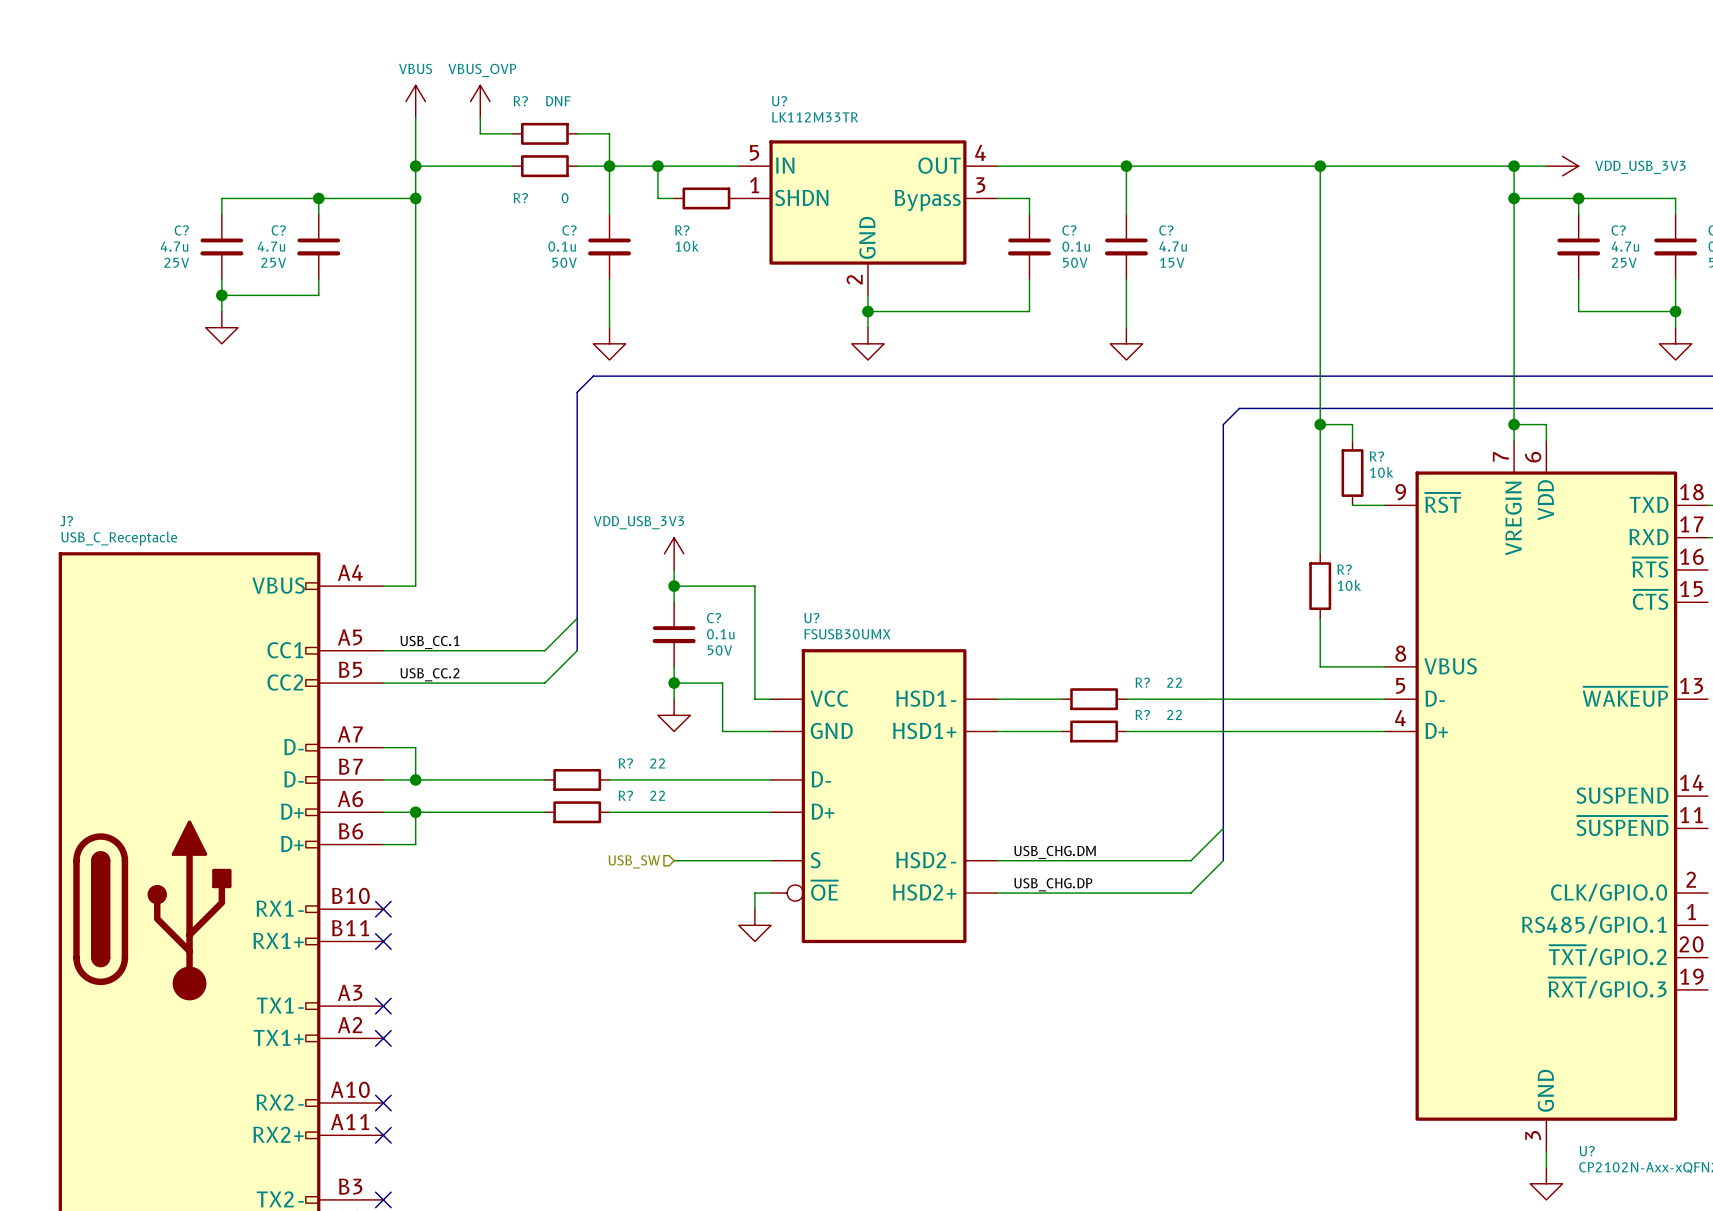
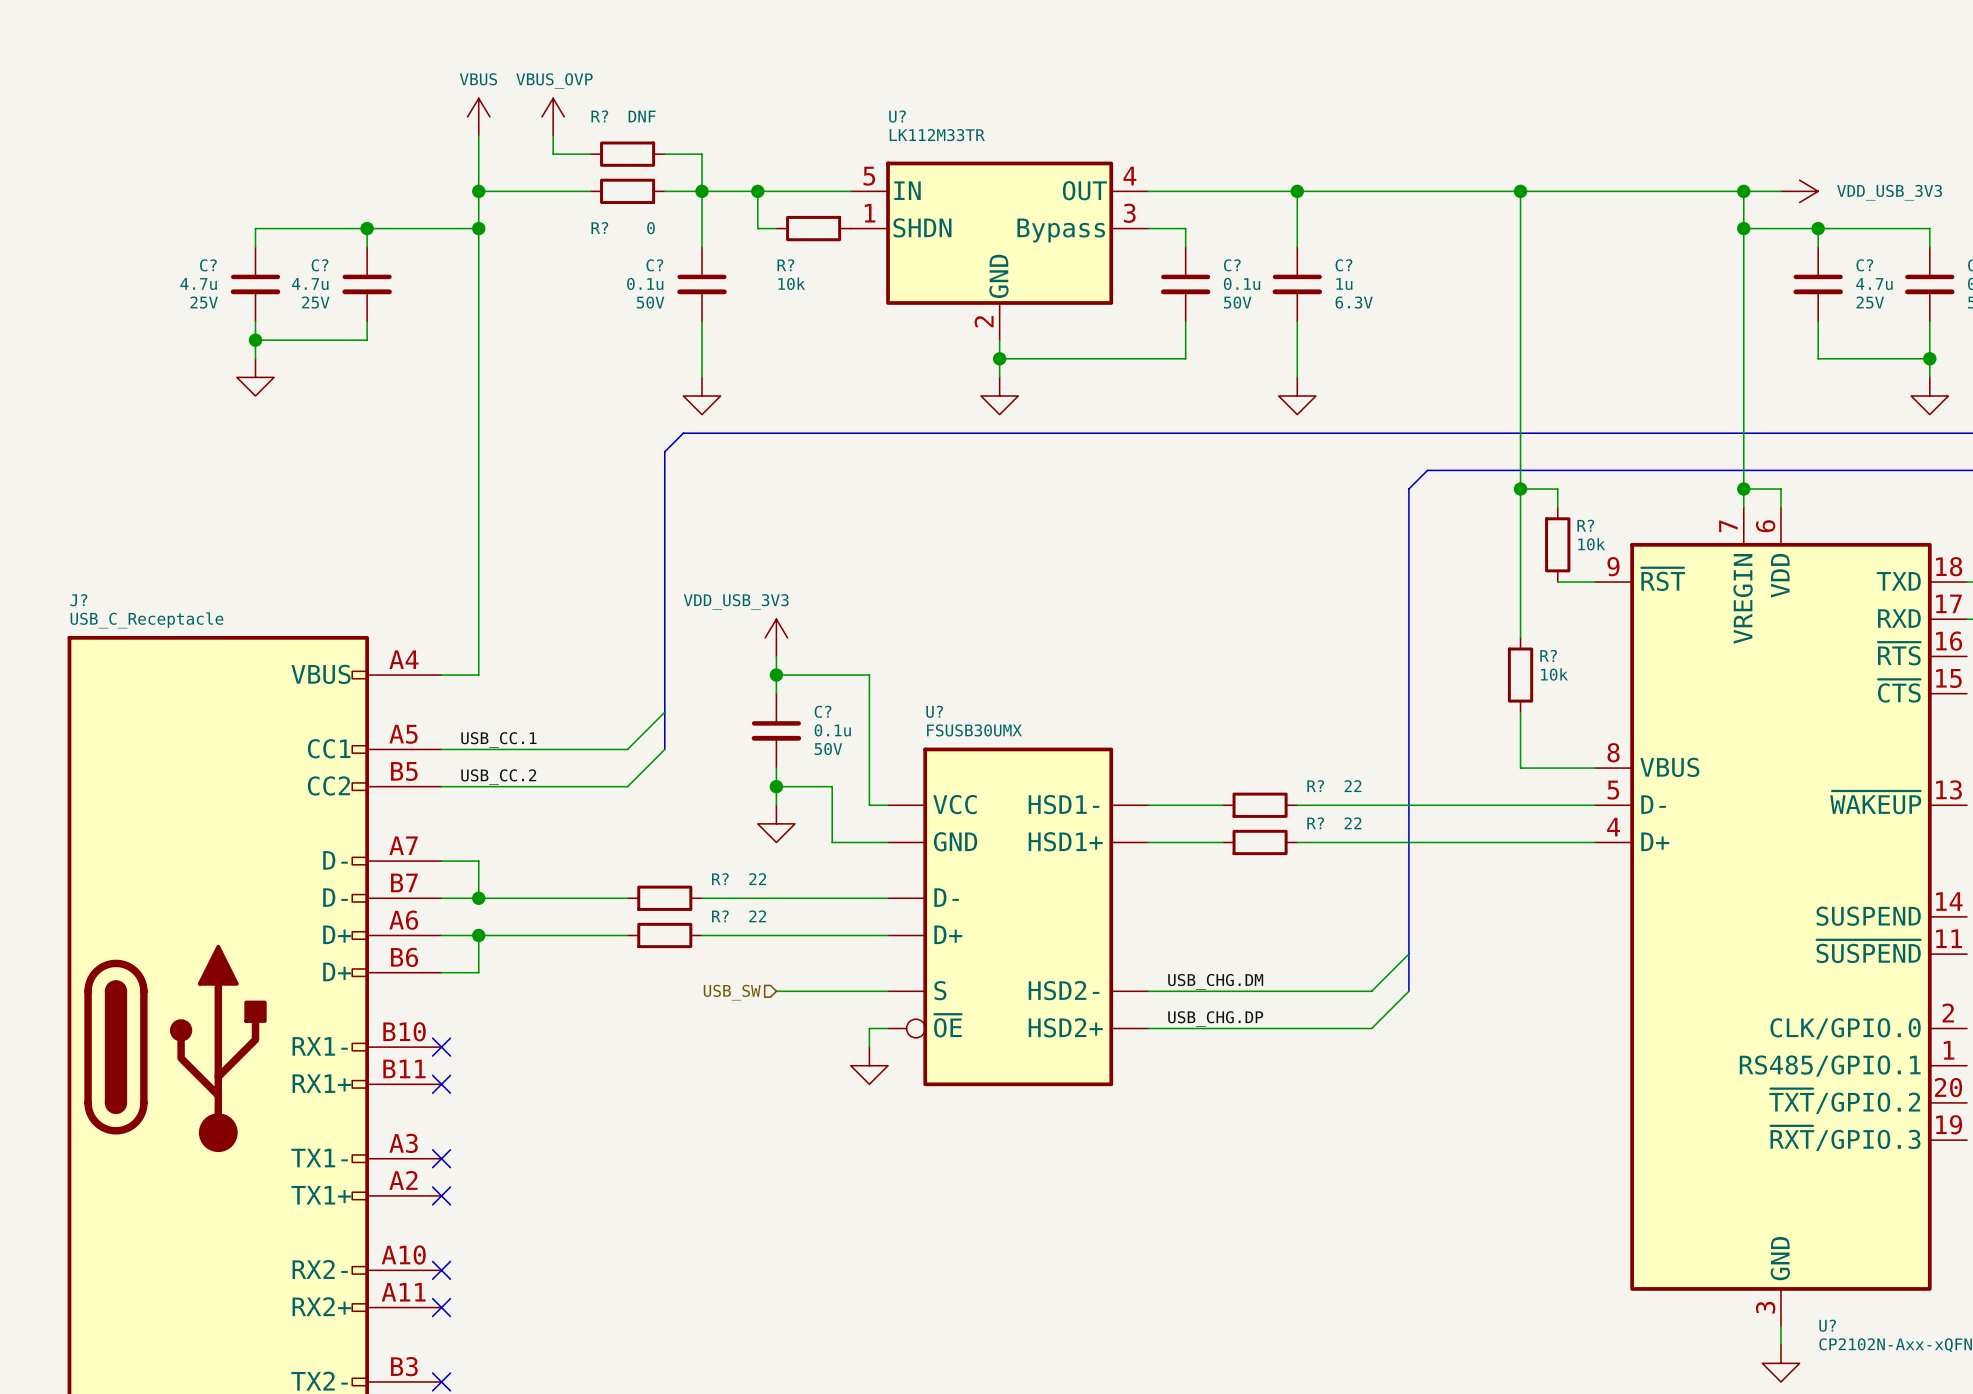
C? value: 4.7u (1173, 246) -> 1u (1344, 284)
C? text: 15V (1172, 262) -> 6.3V (1354, 302)

